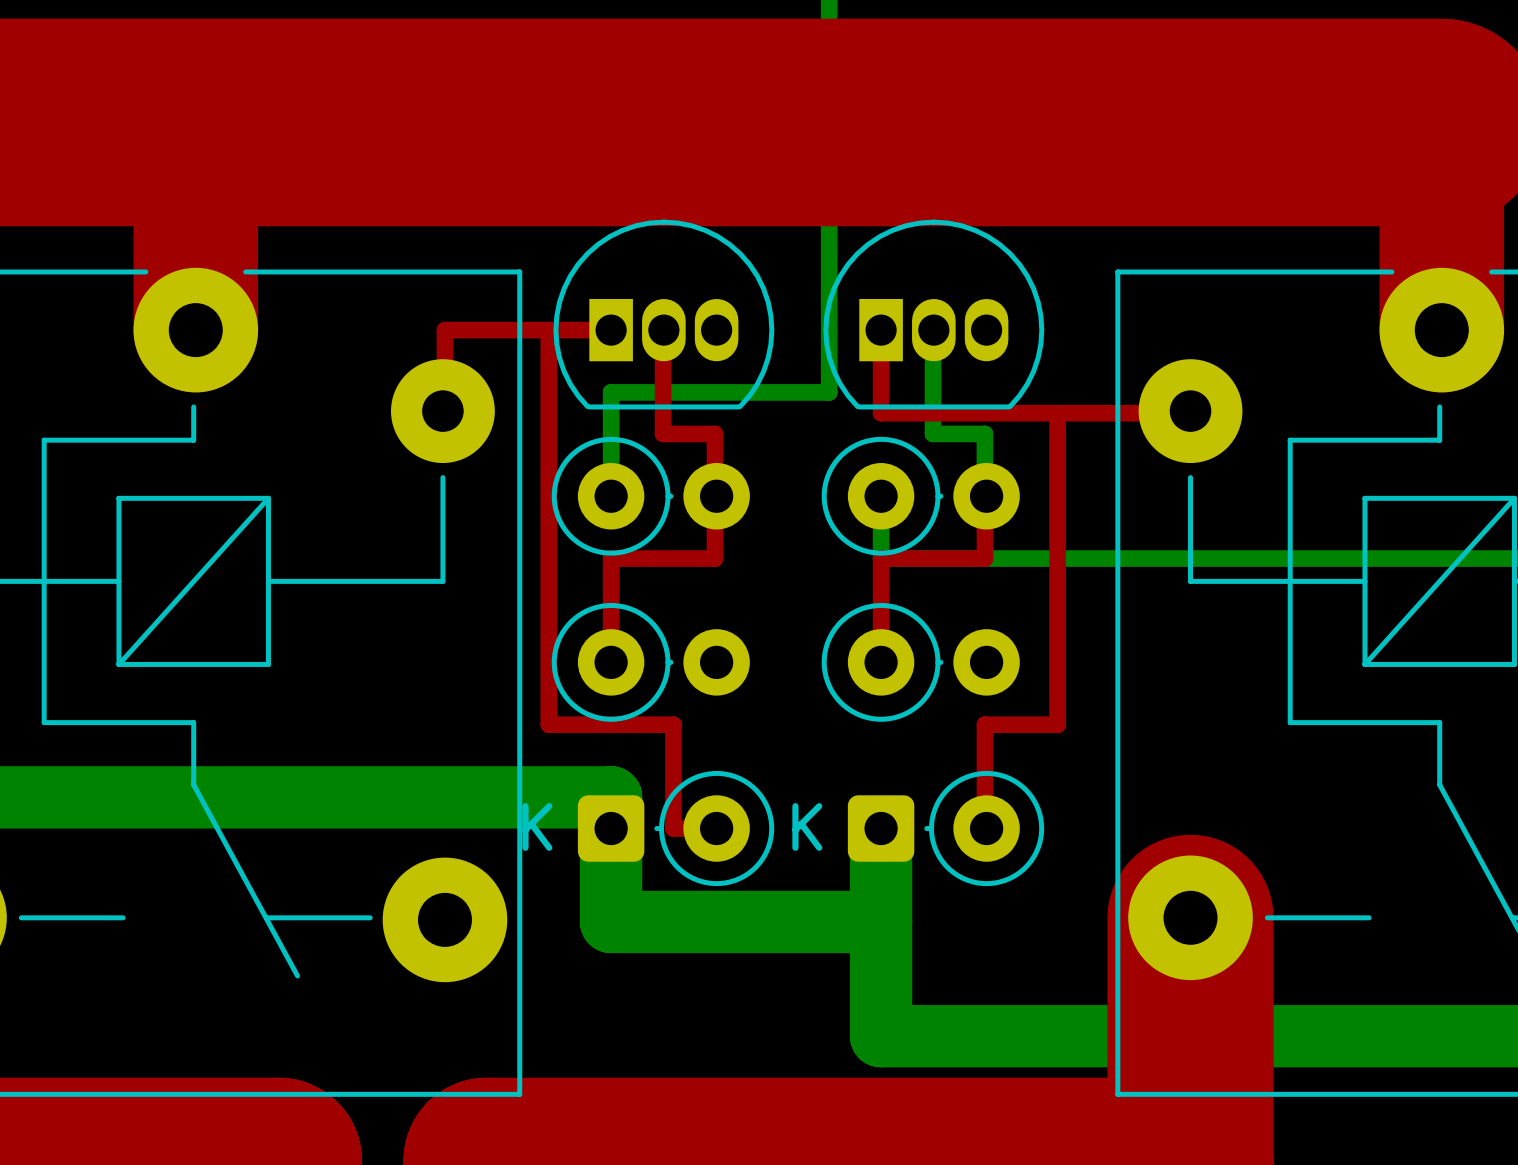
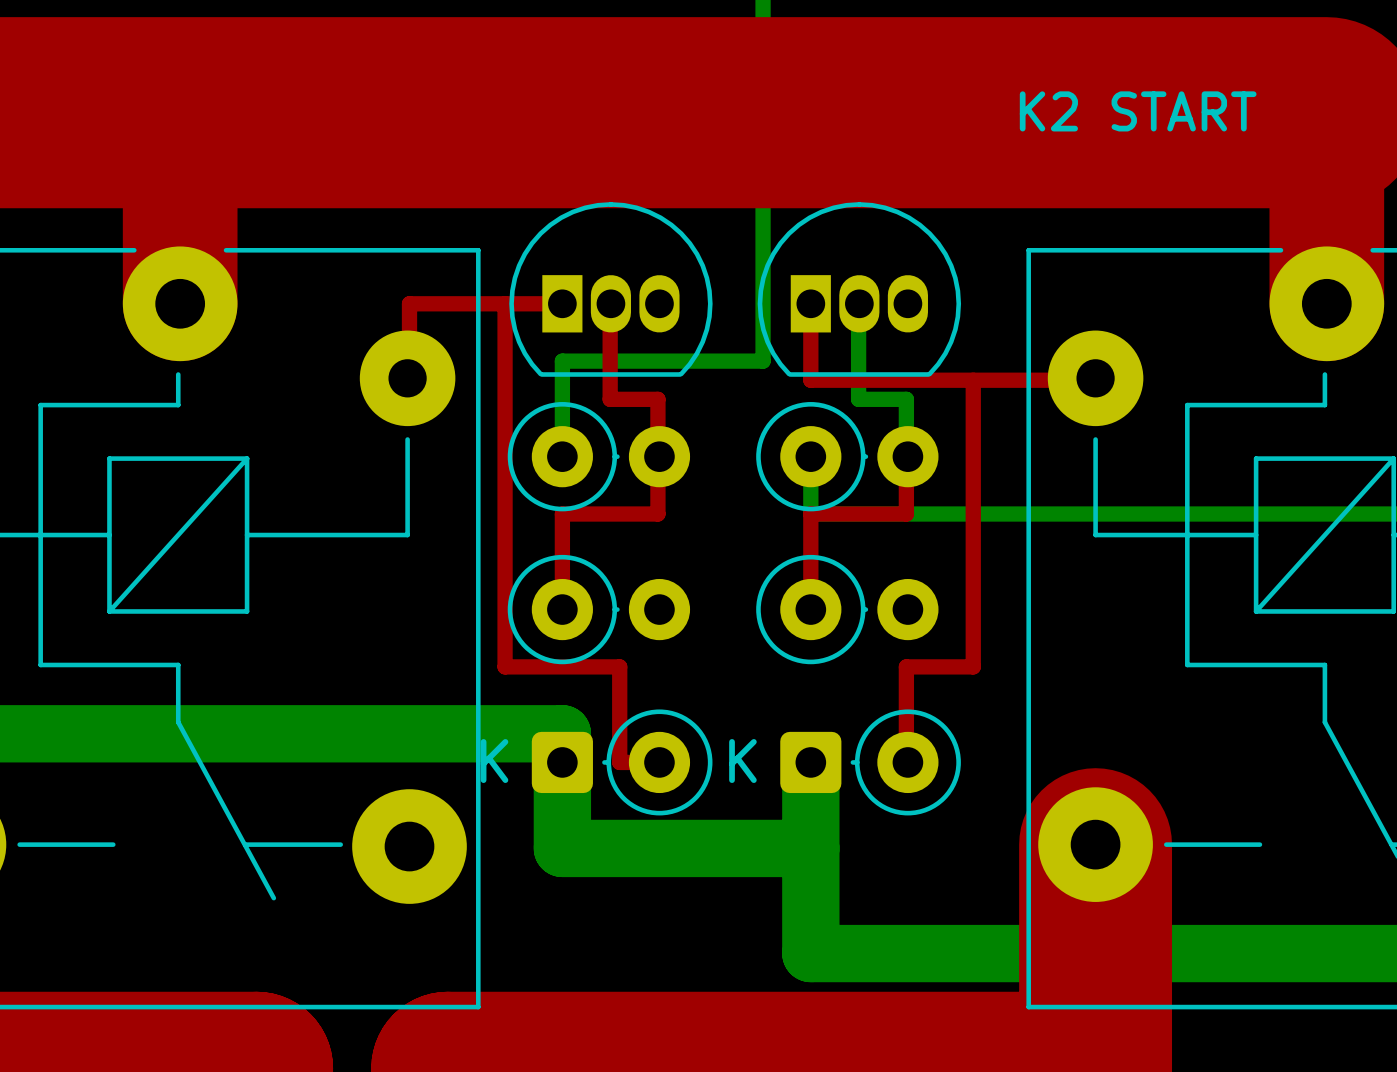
text: none -> K2 START (1138, 111)

